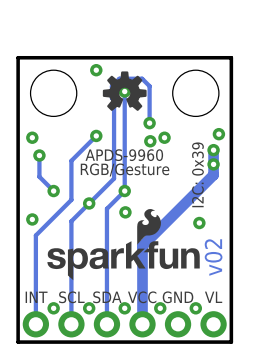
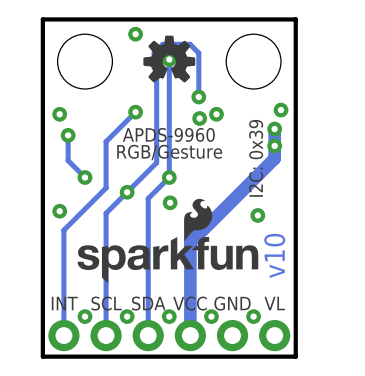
text: v02 (213, 257) -> v10 (274, 255)

